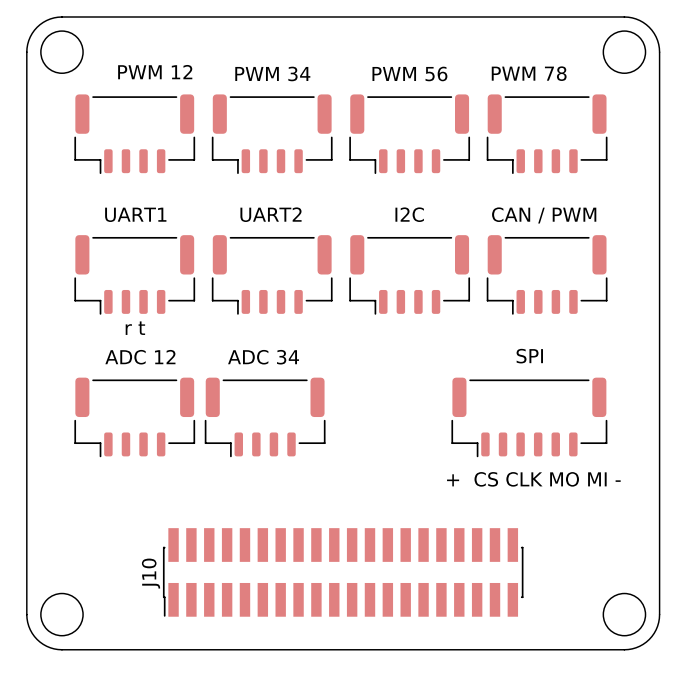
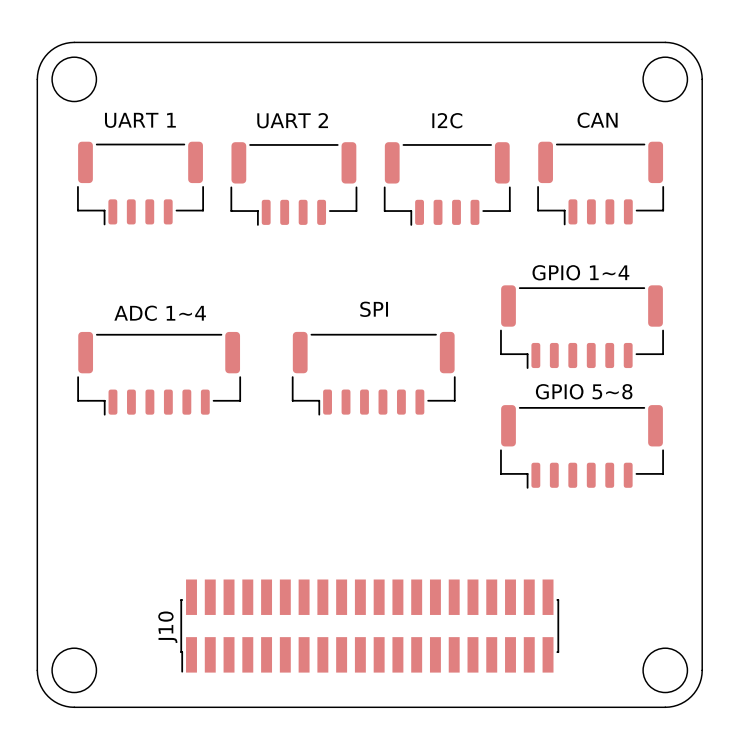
part: PWM 12 (134, 134) -> none
part: PWM 34 (272, 134) -> none
part: PWM 56 (409, 134) -> none
part: PWM 78 (547, 134) -> none
part: none -> UART 1 (140, 183)
part: none -> UART 2 (293, 183)
part: none -> CAN (600, 183)
part value: CAN / PWM (544, 215) -> GPIO 1~4 (580, 272)
part footprint: [486, 235, 608, 315] -> [500, 285, 664, 369]
part: UART1 (134, 274) -> none
part: UART2 (272, 274) -> none
part position: (409, 274) -> (447, 183)
part: none -> ADC 1~4 (159, 373)
part: none -> SPI (373, 373)
part: none -> GPIO 5~8 (582, 446)
part: ADC 12 (134, 417) -> none
part: ADC 34 (265, 417) -> none
part: SPI (529, 417) -> none

